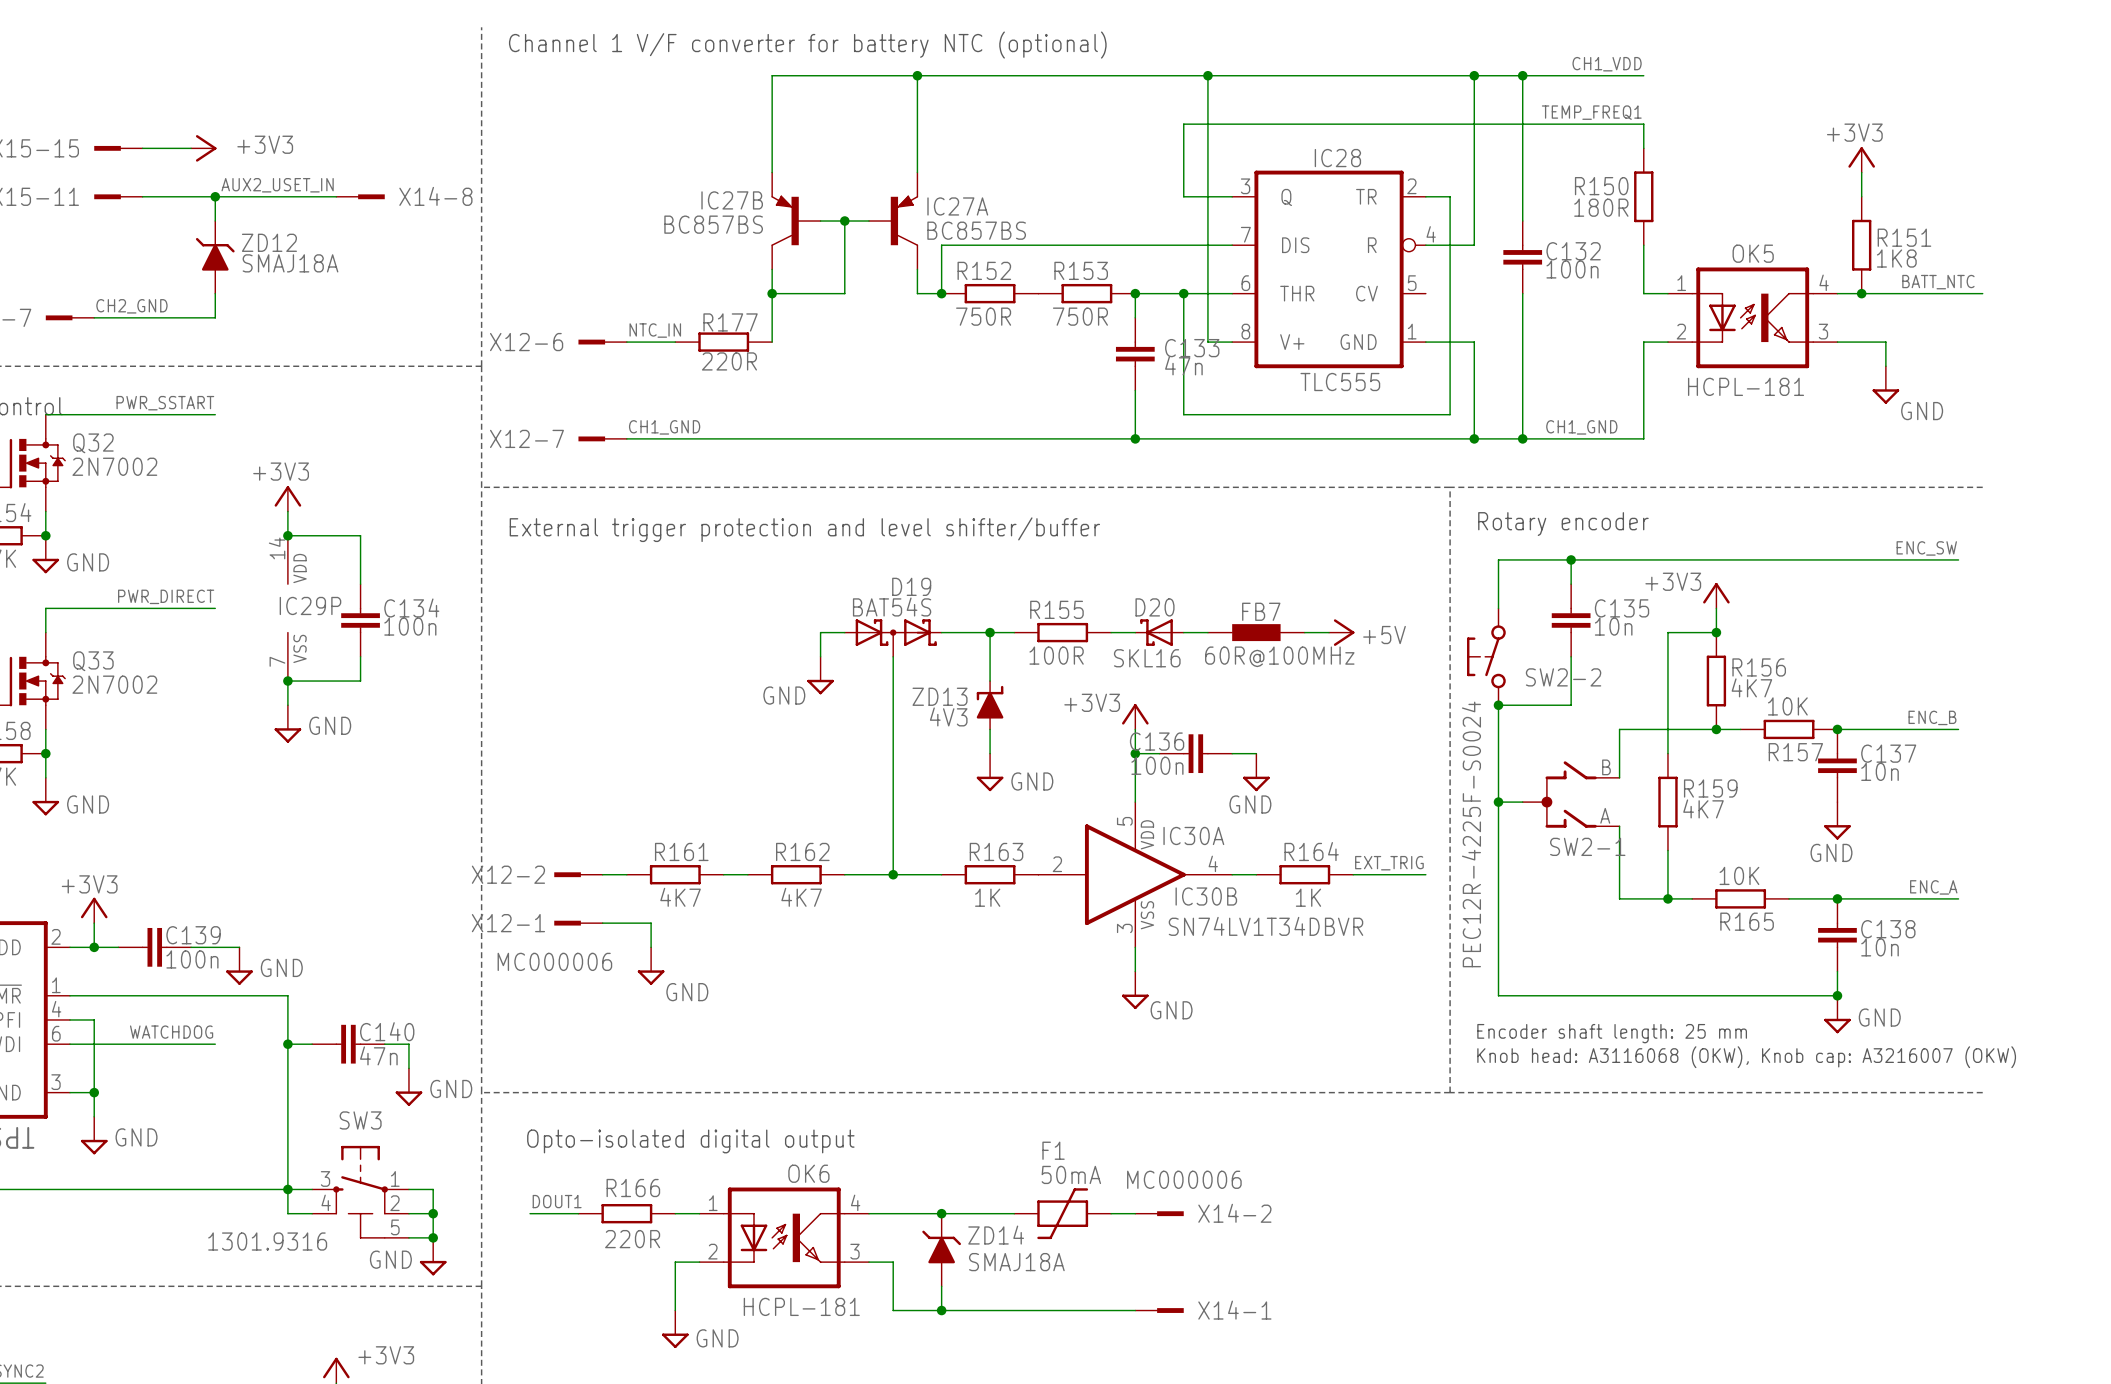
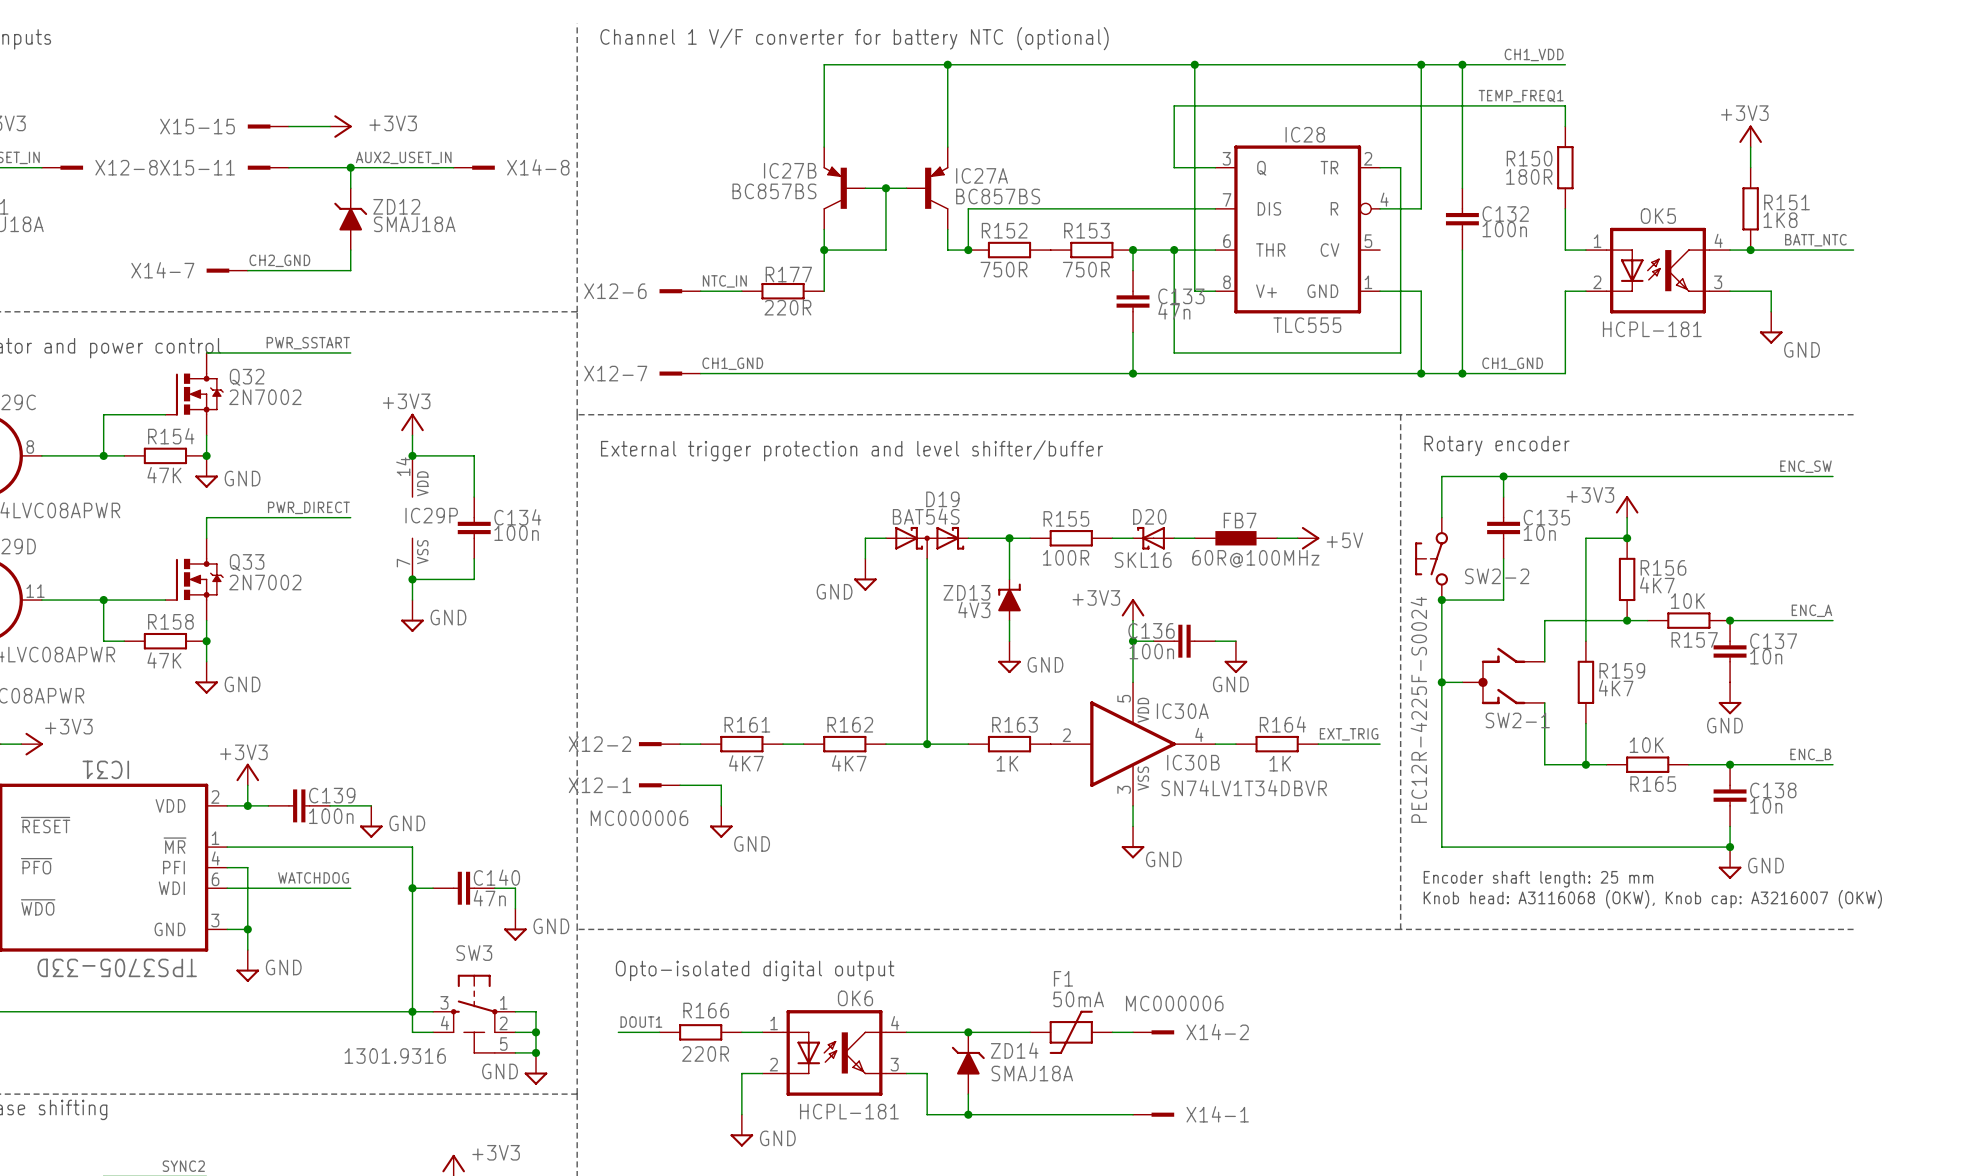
label: ENC_B (1932, 717) -> ENC_A (1811, 610)
SW2-1 pin number: B (1606, 767) -> none
SW2-1 pin number: A (1605, 815) -> none
label: ENC_A (1933, 887) -> ENC_B (1810, 754)

